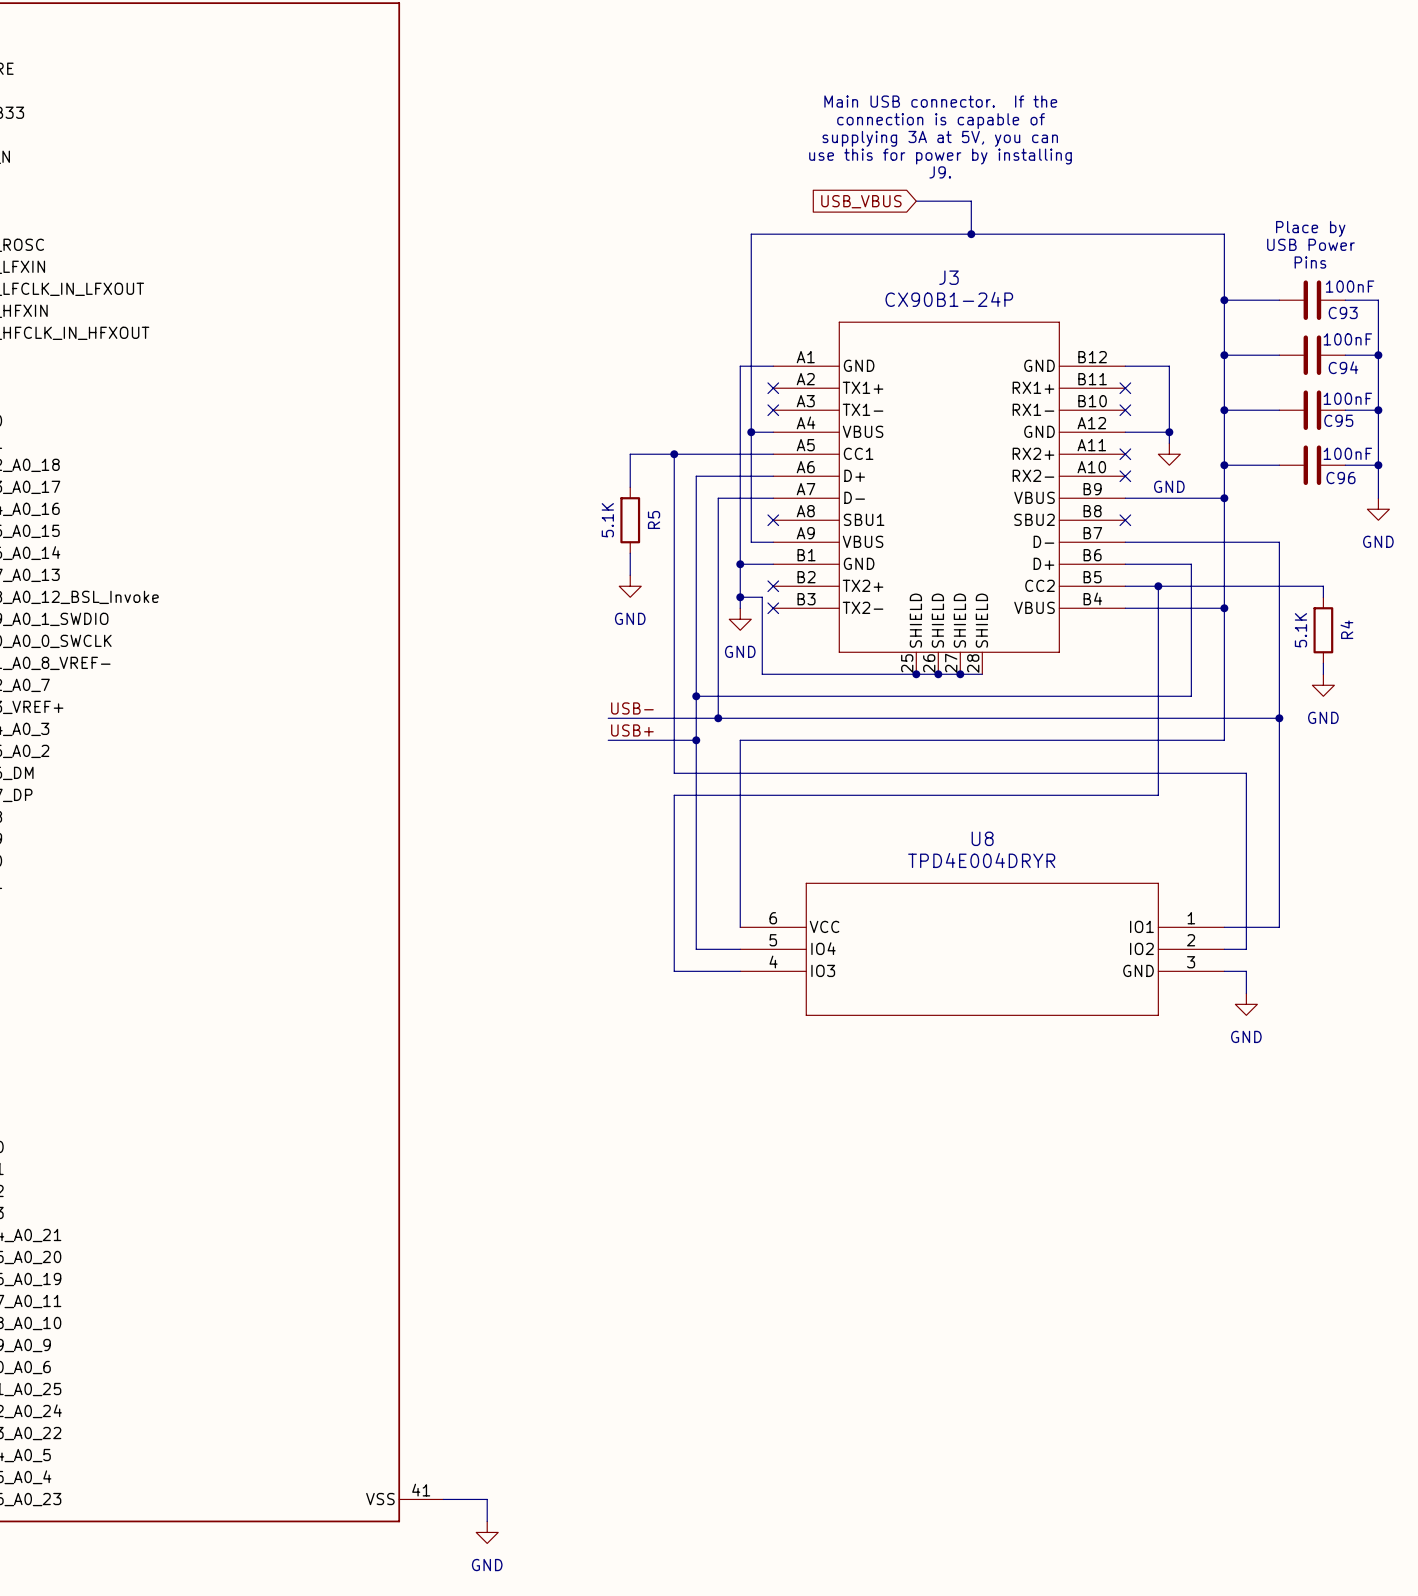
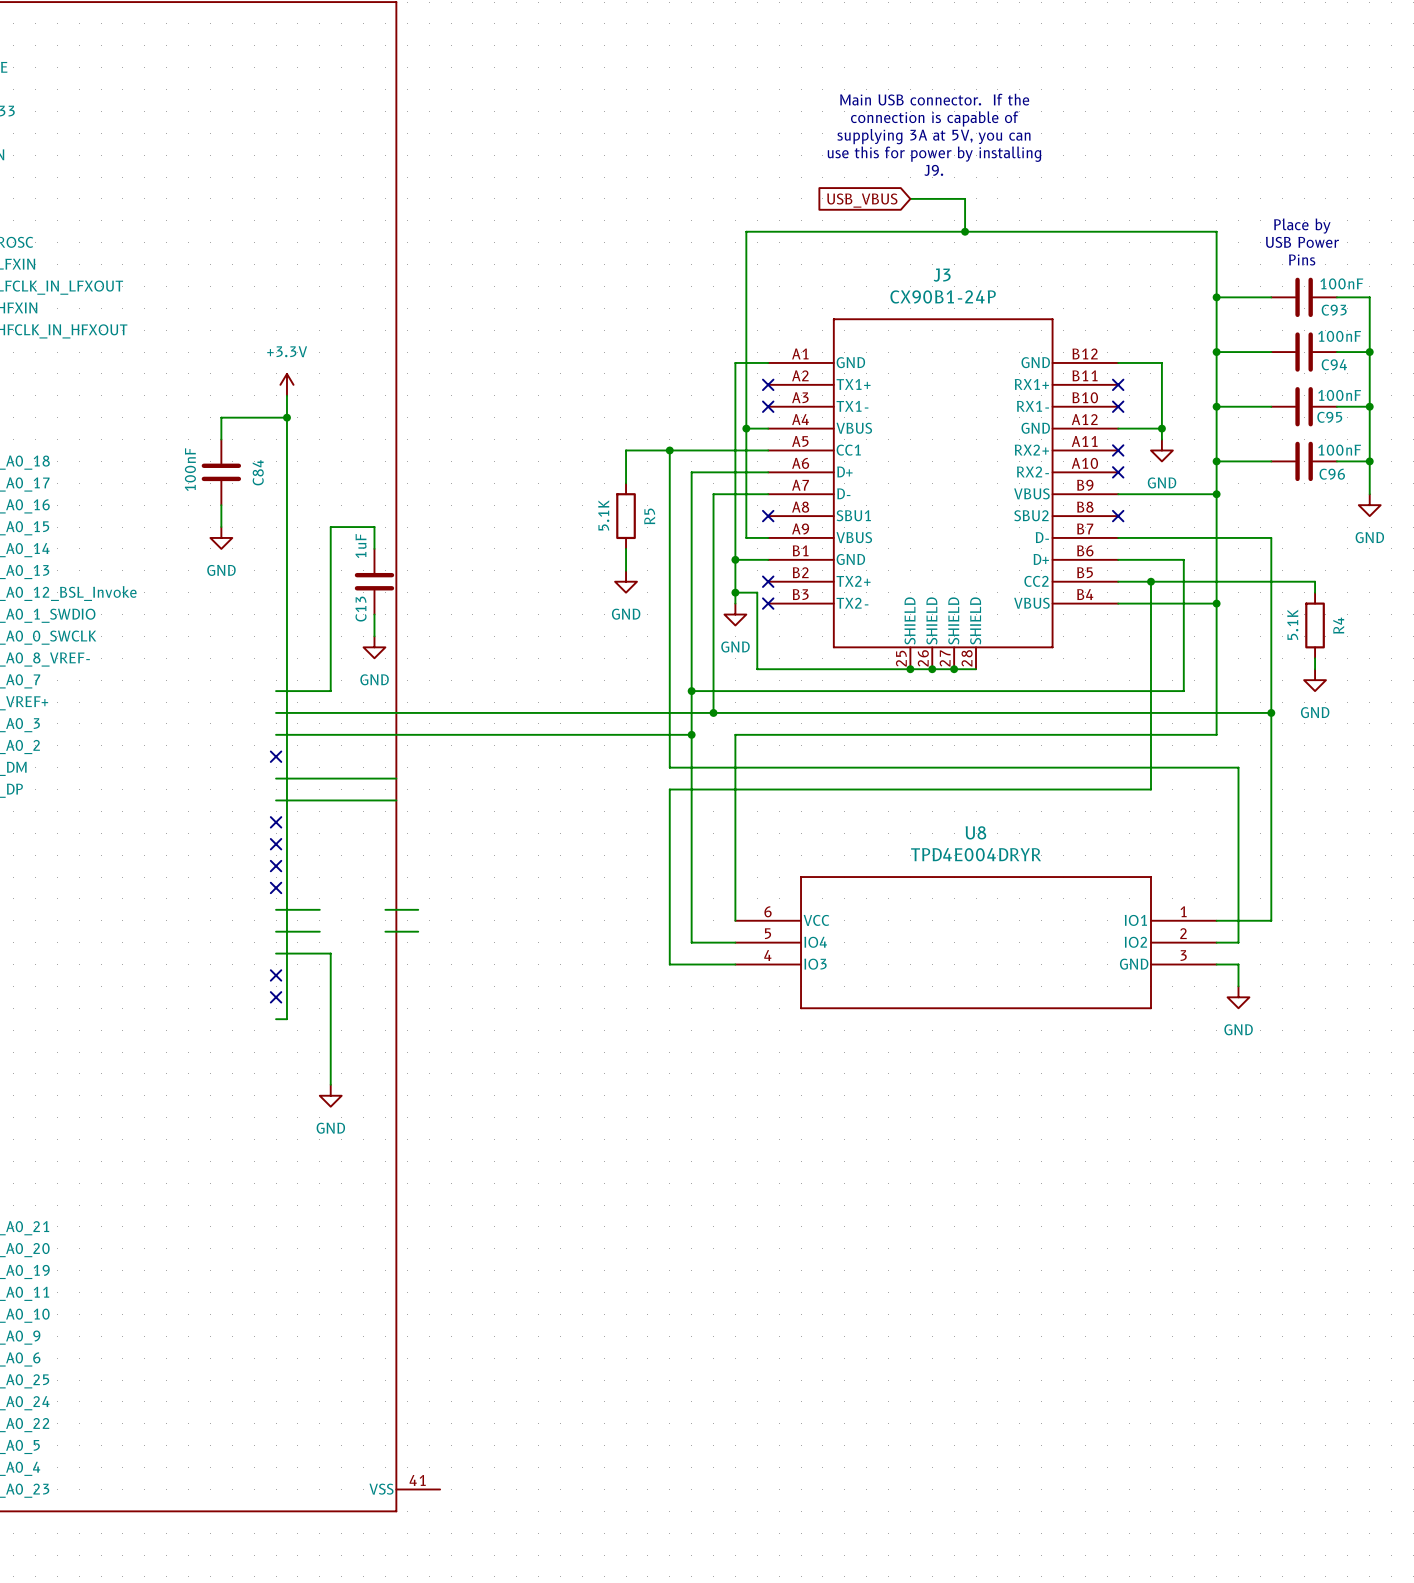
power symbol: none -> +3.3V (286, 384)
wire: none -> (286, 395) (286, 1019) (276, 1019)
wire: none -> (286, 417) (221, 417) (221, 439)
junction: none -> (286, 417)
C84: none -> 100nF (221, 472)
wire: none -> (221, 505) (221, 527)
power symbol: none -> GND (221, 537)
wire: none -> (374, 548) (374, 527) (330, 527) (330, 691) (276, 691)
C13: none -> 1uF (374, 581)
wire: none -> (374, 614) (374, 636)
power symbol: none -> GND (374, 647)
label: USB- (632, 708) -> none
wire: none -> (276, 712) (604, 712)
label: USB+ (632, 730) -> none
wire: none -> (276, 734) (604, 734)
no-connect mark: none -> (276, 756)
wire: none -> (276, 778) (396, 778)
wire: none -> (276, 800) (396, 800)
no-connect mark: none -> (276, 822)
no-connect mark: none -> (276, 844)
no-connect mark: none -> (276, 866)
no-connect mark: none -> (276, 887)
wire: none -> (276, 909) (319, 909)
wire: none -> (385, 909) (418, 909)
wire: none -> (276, 931) (319, 931)
wire: none -> (385, 931) (418, 931)
wire: none -> (276, 953) (330, 953) (330, 1084)
no-connect mark: none -> (276, 975)
no-connect mark: none -> (276, 997)
power symbol: none -> GND (330, 1095)
wire: (443, 1499) (487, 1499) (487, 1521) -> none
power symbol: GND (487, 1532) -> none

